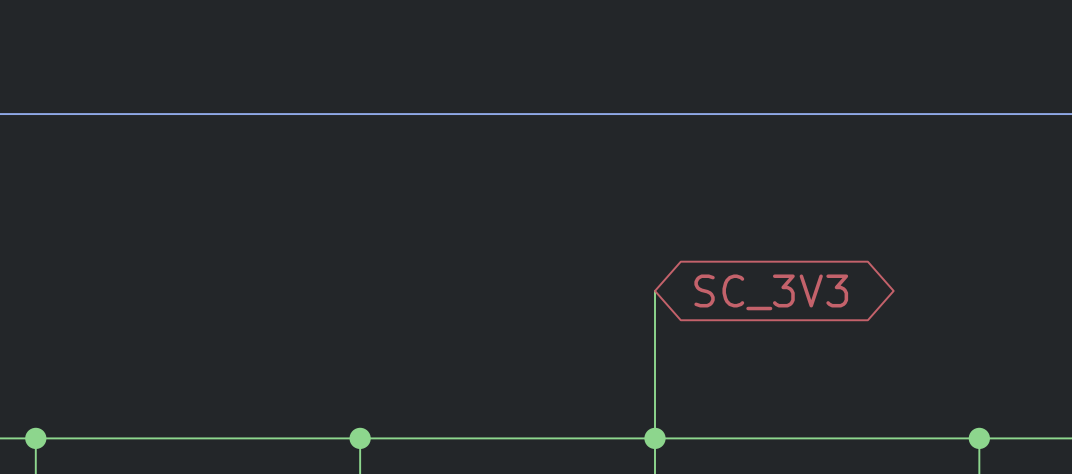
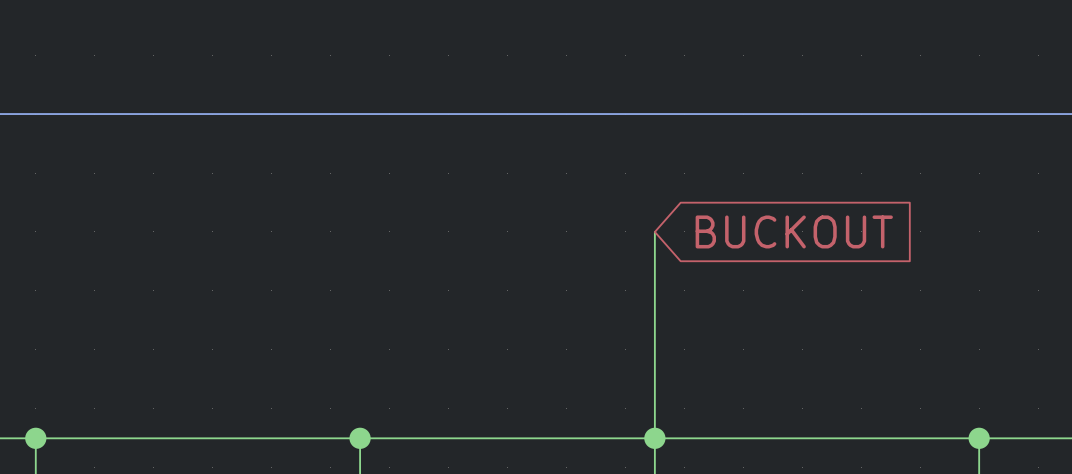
wire: none -> (654, 231) (654, 290)
global label: none -> BUCKOUT (794, 231)
global label: SC_3V3 (771, 292) -> none

